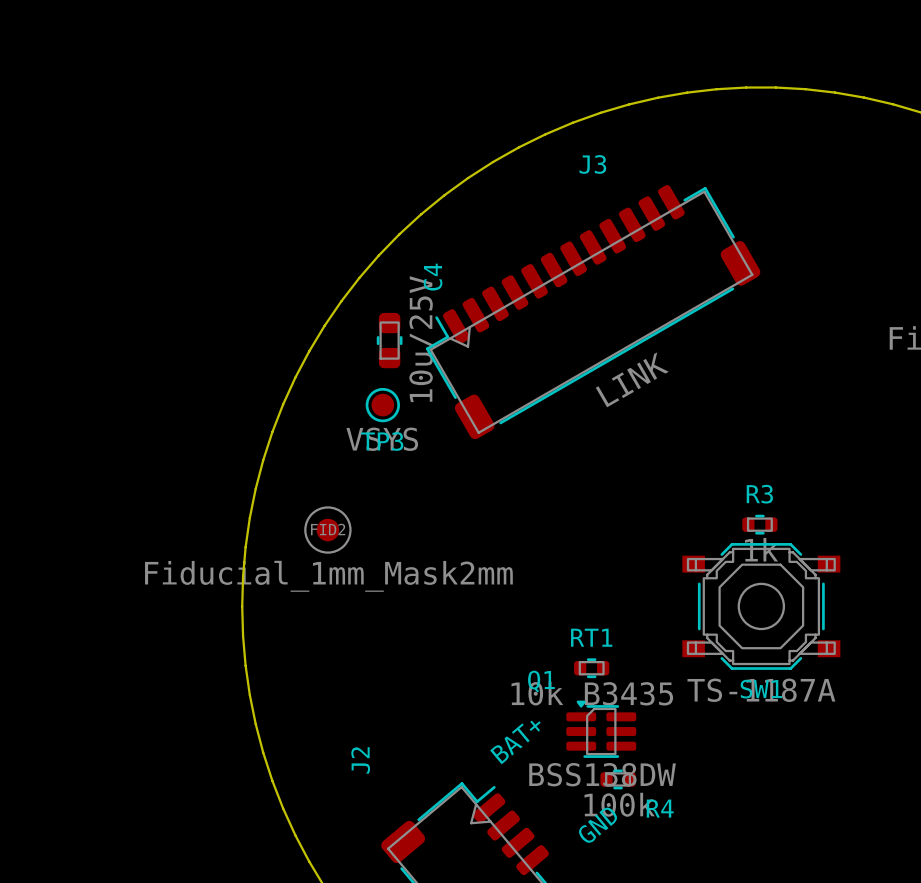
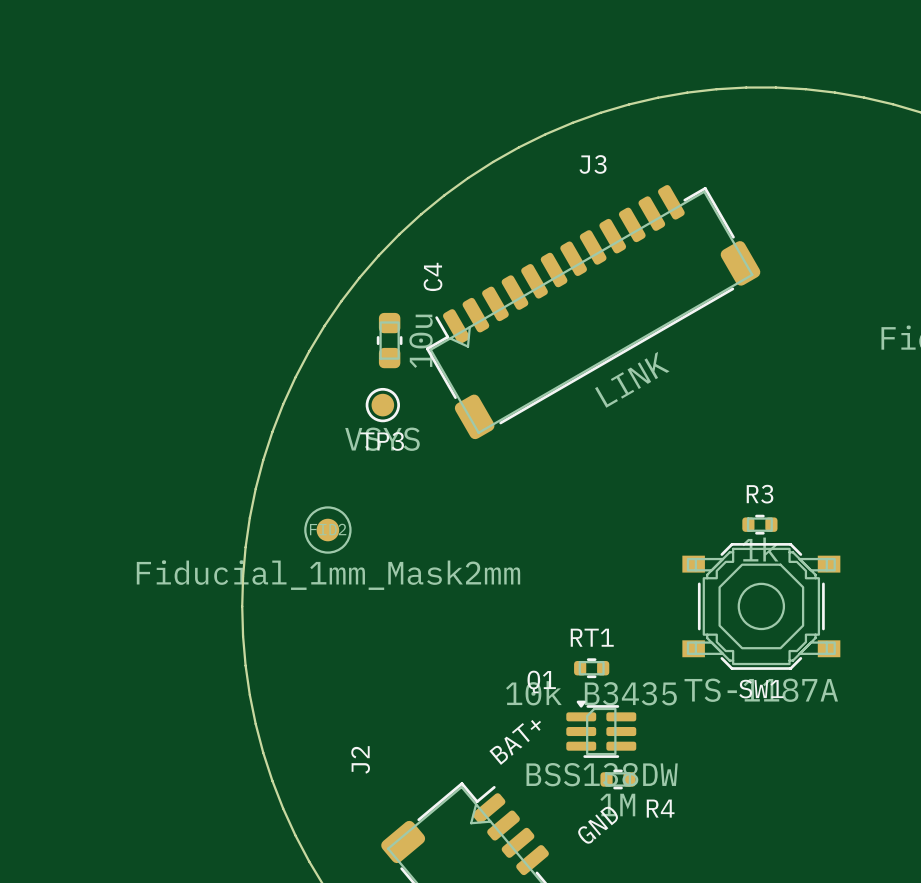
C4 value: 10u/25V (422, 339) -> 10u (421, 341)
R4 value: 100k (619, 804) -> 1M (617, 805)

